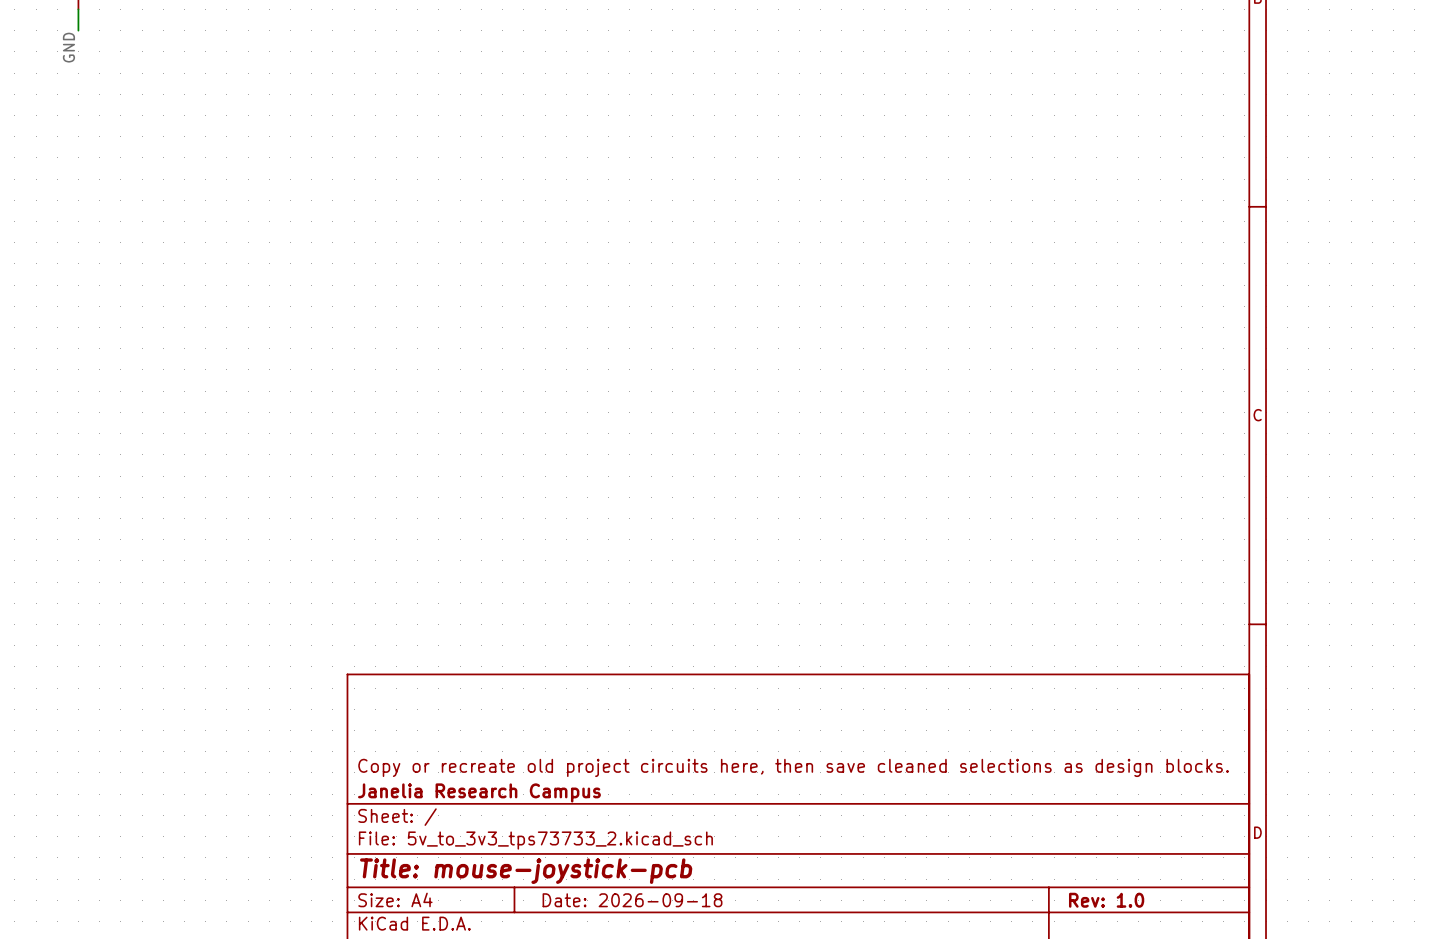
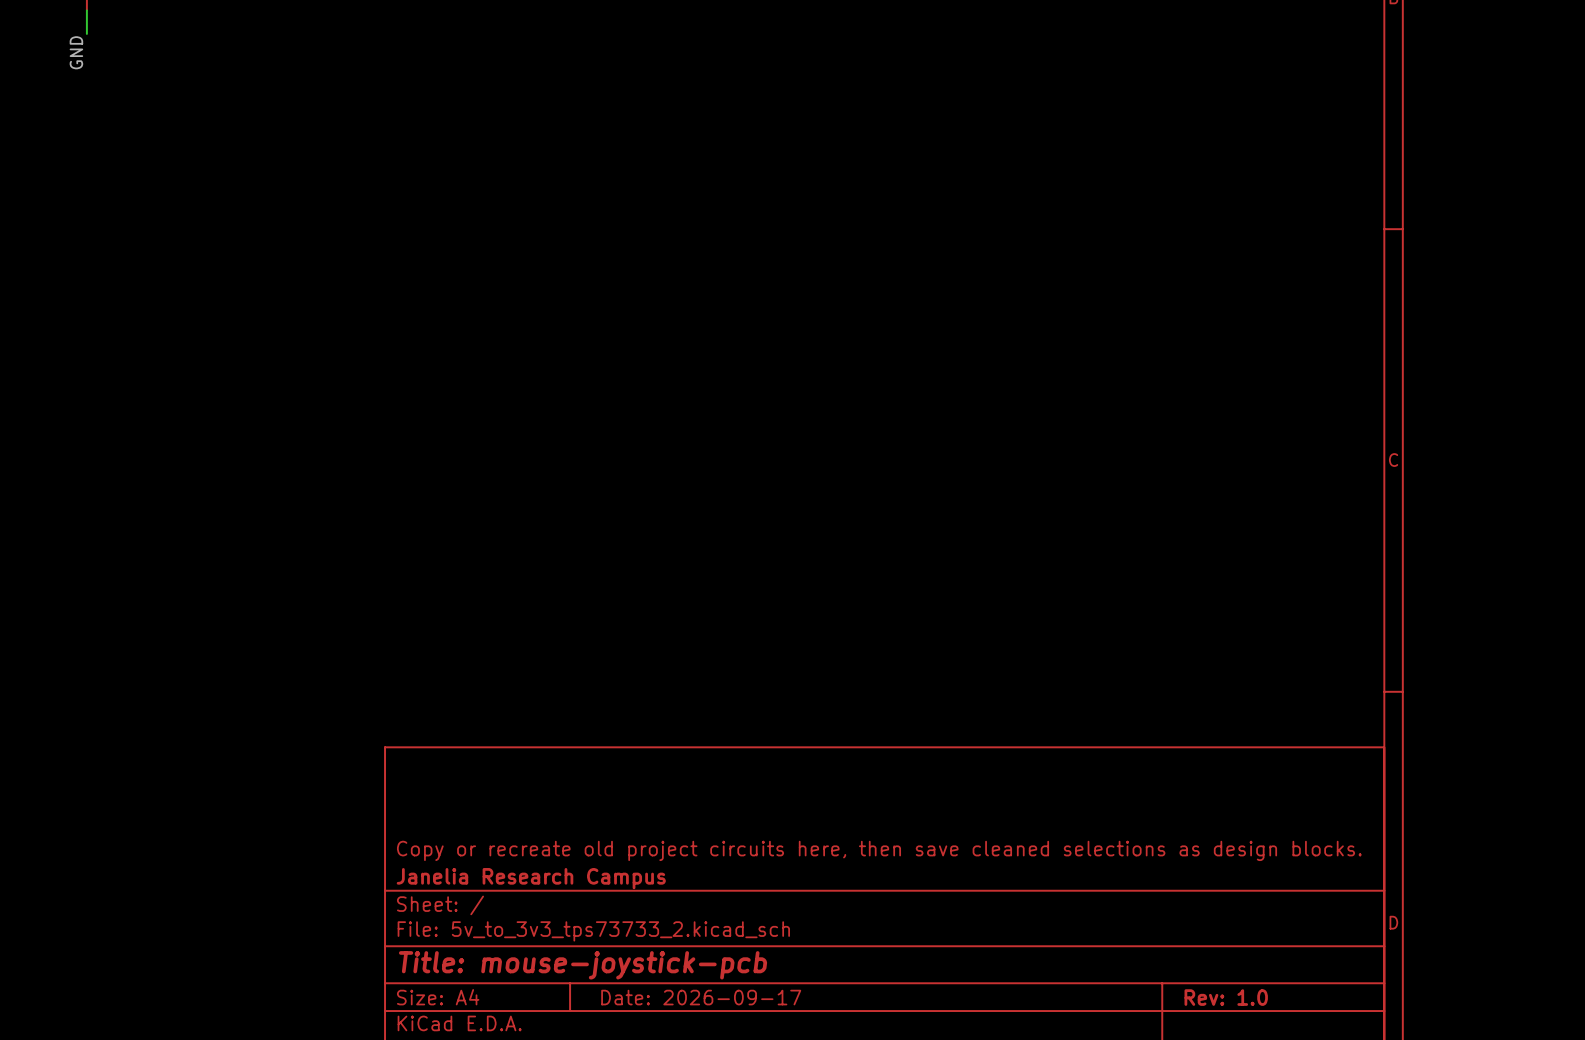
title block: Date: 2026-09-18 (632, 900) -> Date: 2026-09-17 (701, 997)

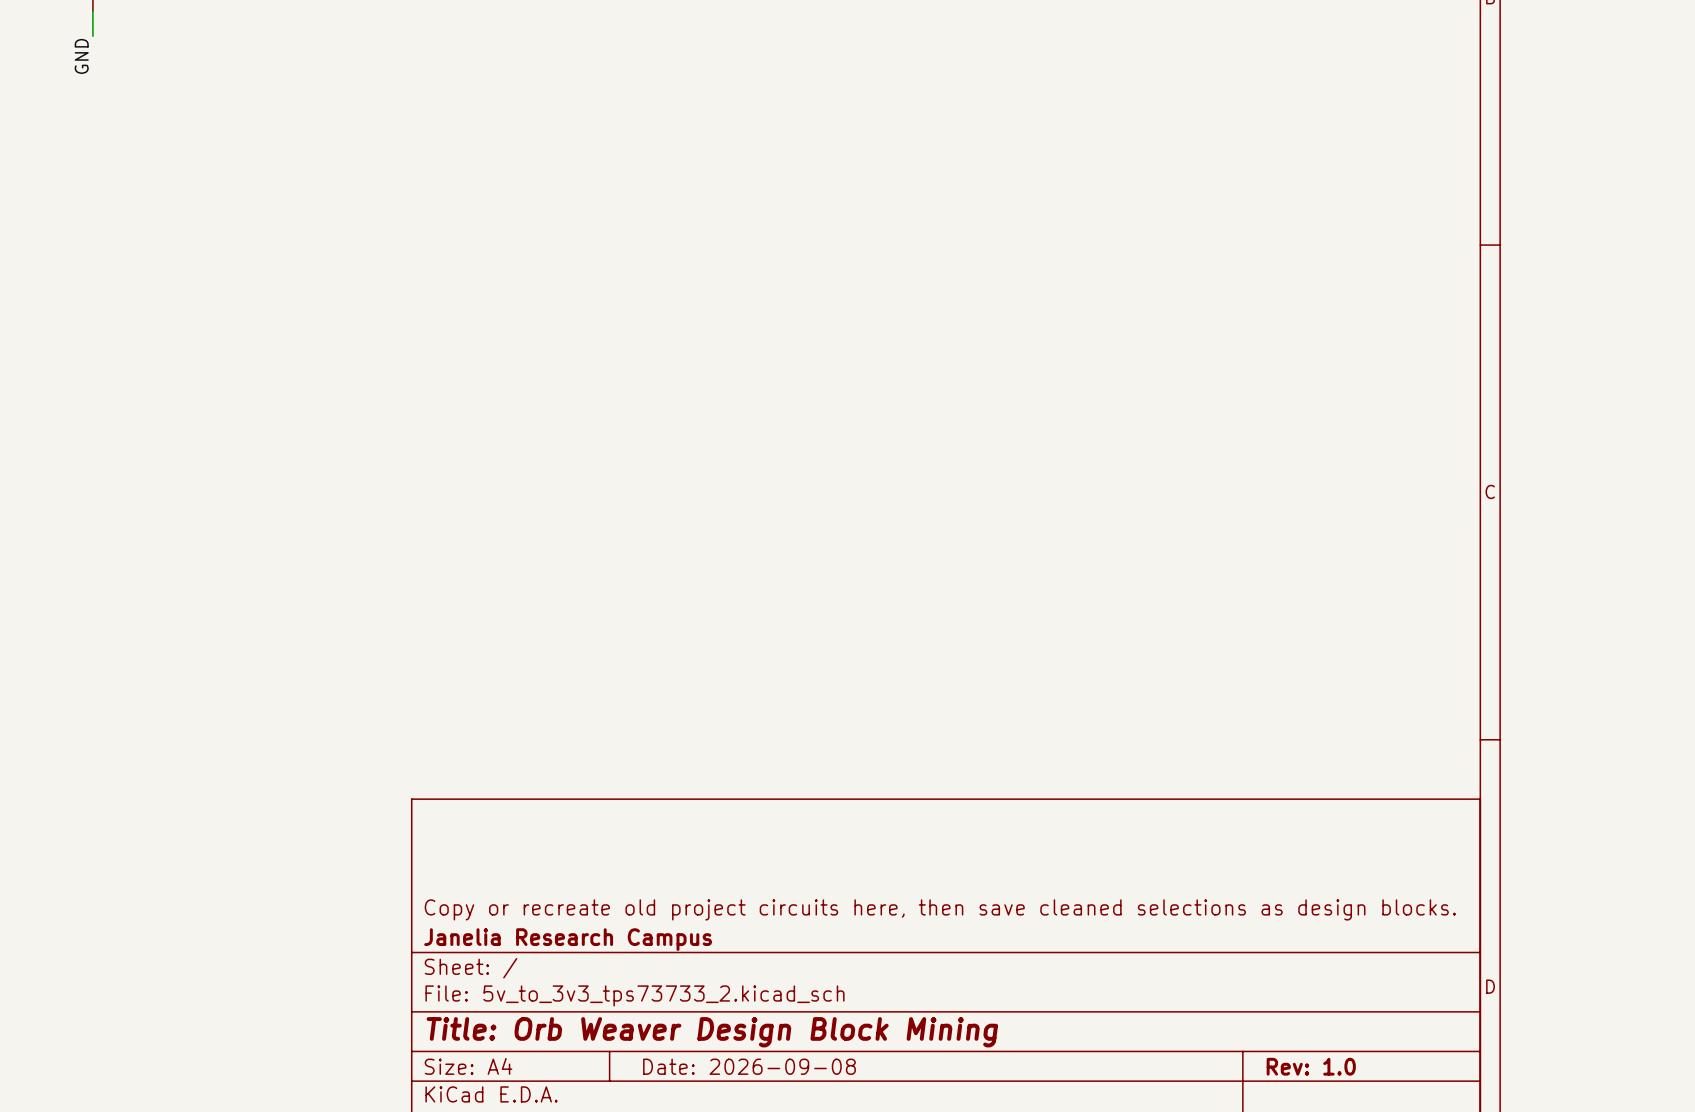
title block: Title: mouse-joystick-pcb (583, 965) -> Title: Orb Weaver Design Block Mining (712, 1032)
title block: Date: 2026-09-17 (701, 997) -> Date: 2026-09-08 (749, 1066)

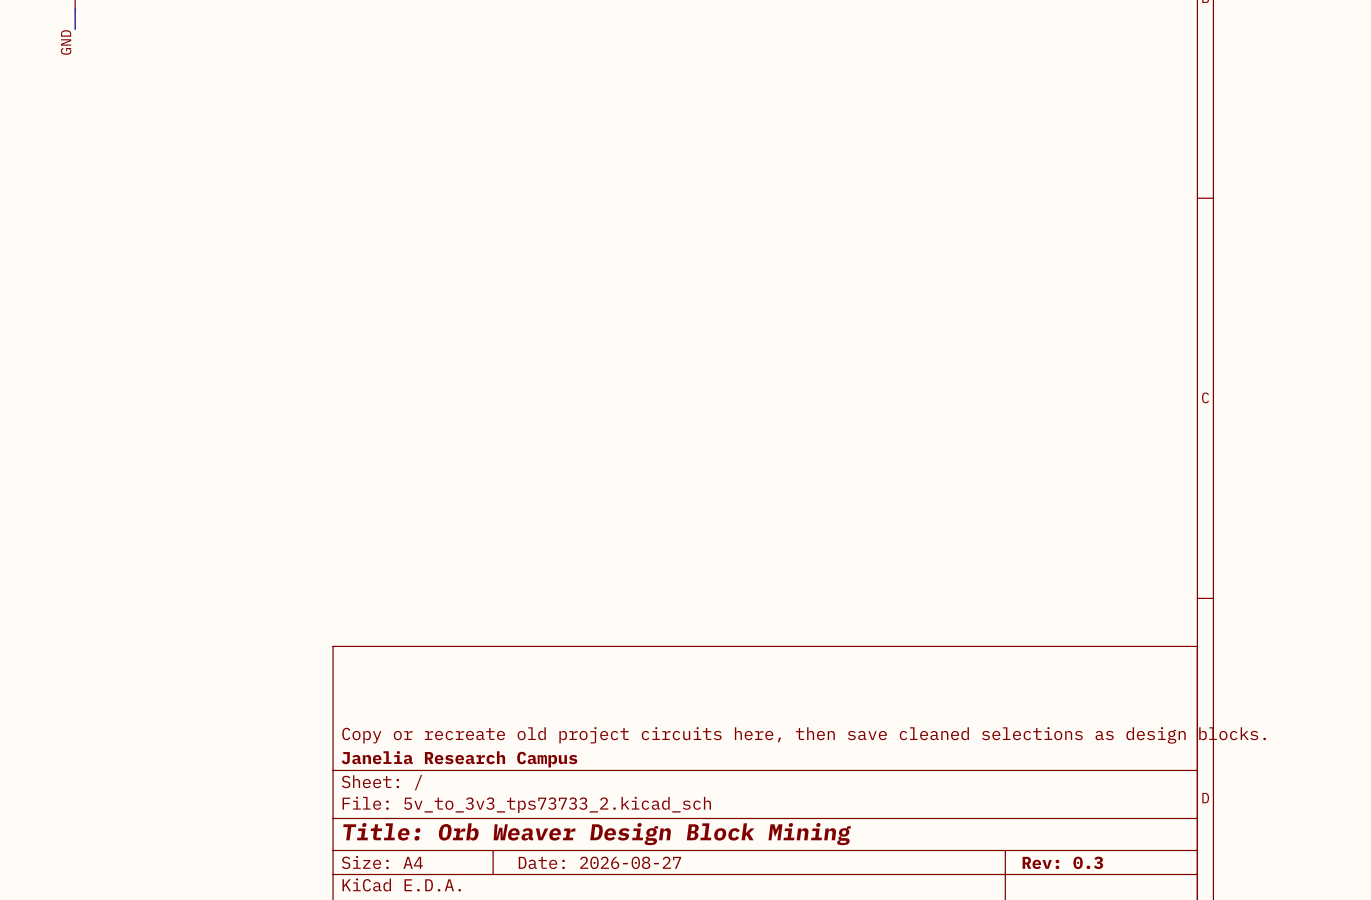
title block: Date: 2026-09-08 (749, 1066) -> Date: 2026-08-27 (599, 862)
title block: Rev: 1.0 (1311, 1066) -> Rev: 0.3 (1062, 862)

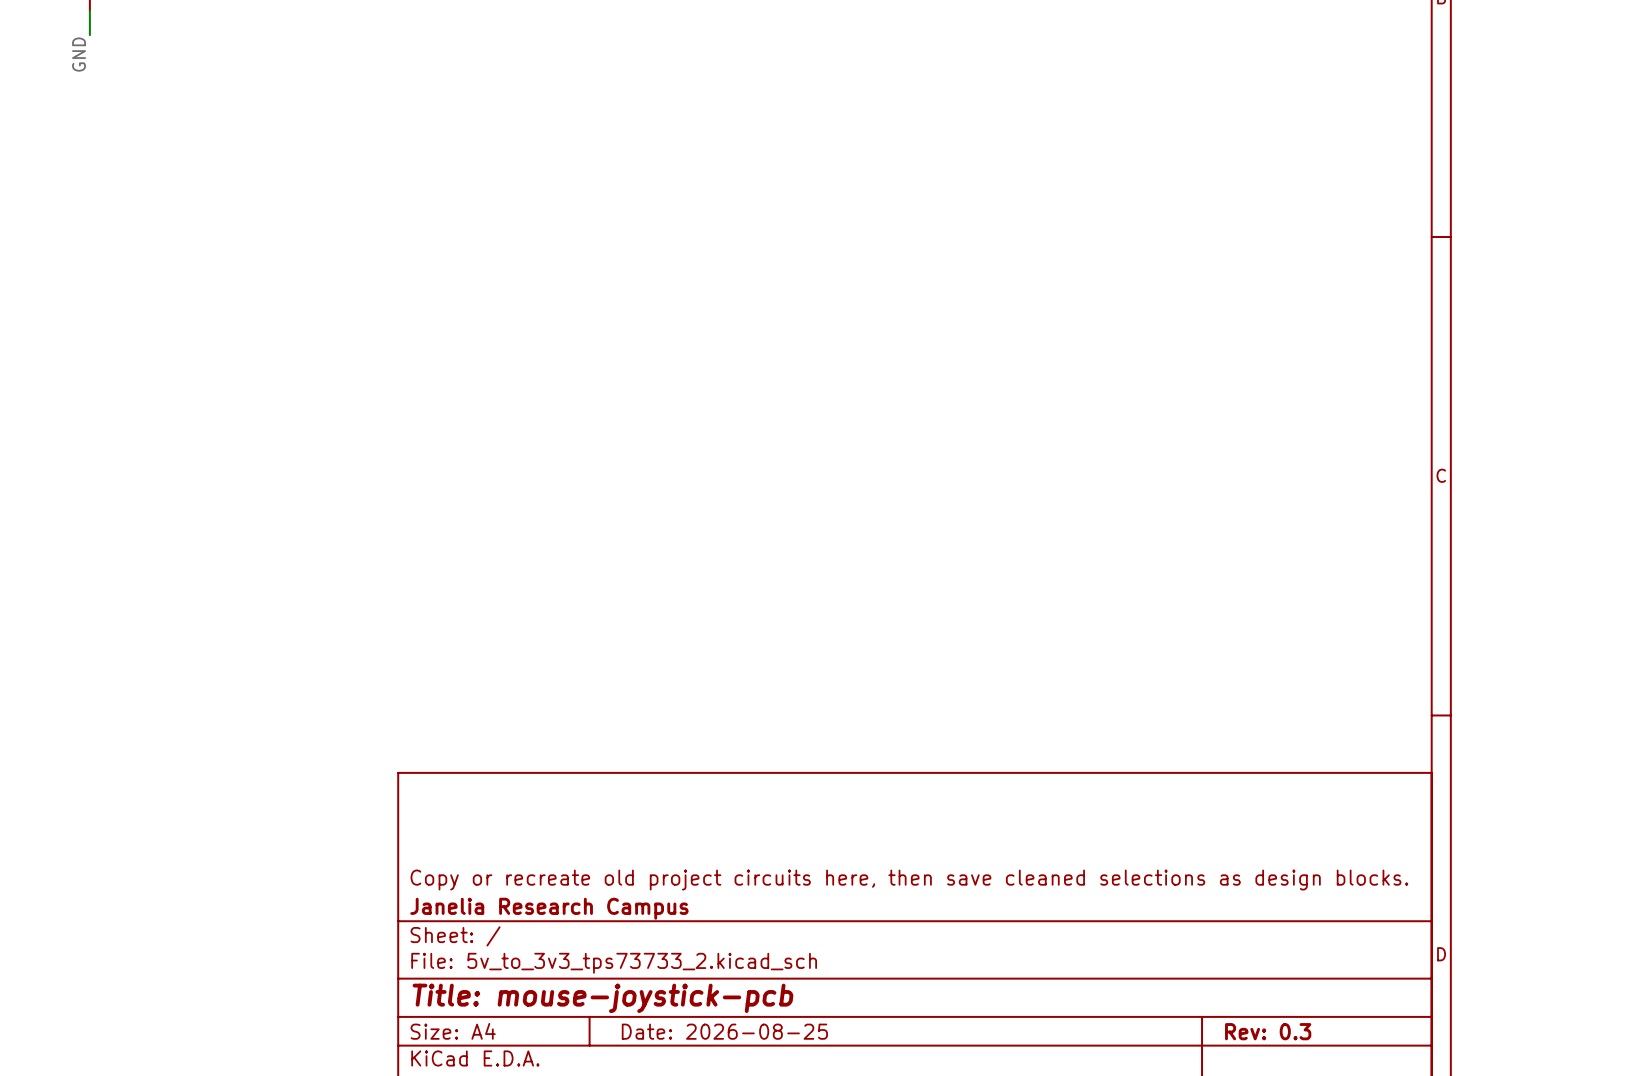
title block: Title: Orb Weaver Design Block Mining (597, 834) -> Title: mouse-joystick-pcb (602, 998)
title block: Date: 2026-08-27 (599, 862) -> Date: 2026-08-25 (724, 1031)

